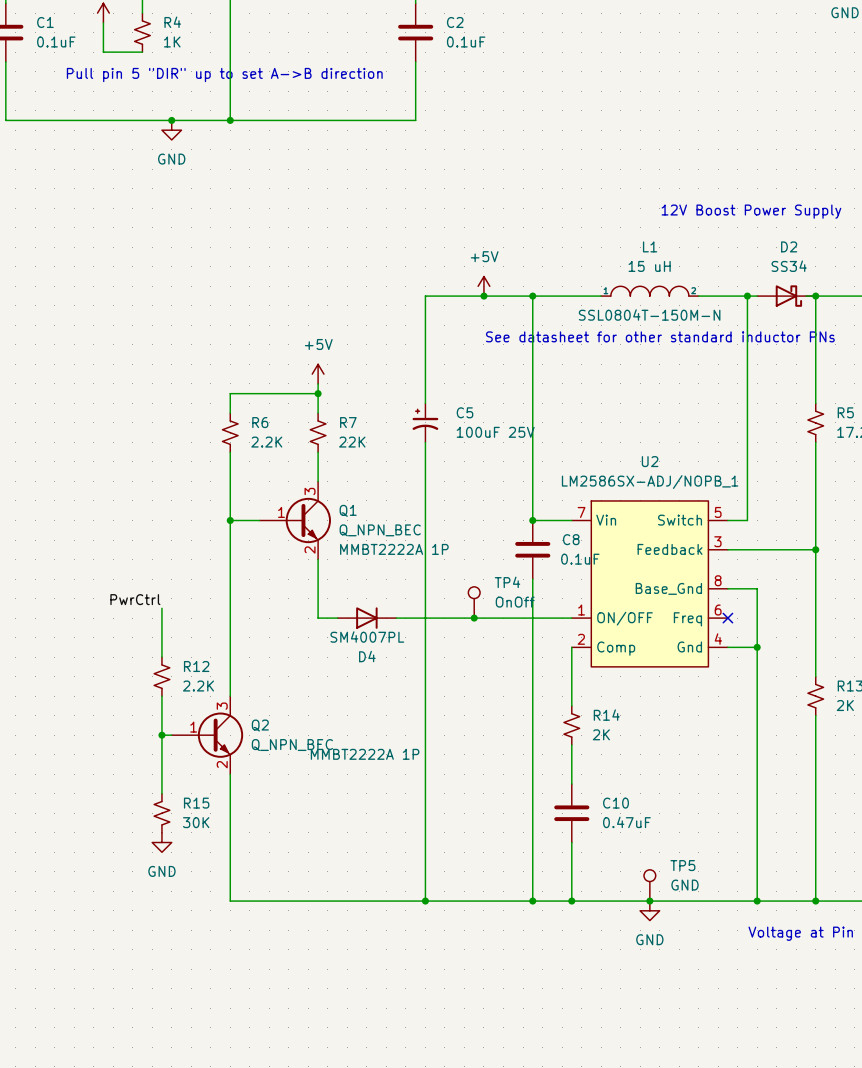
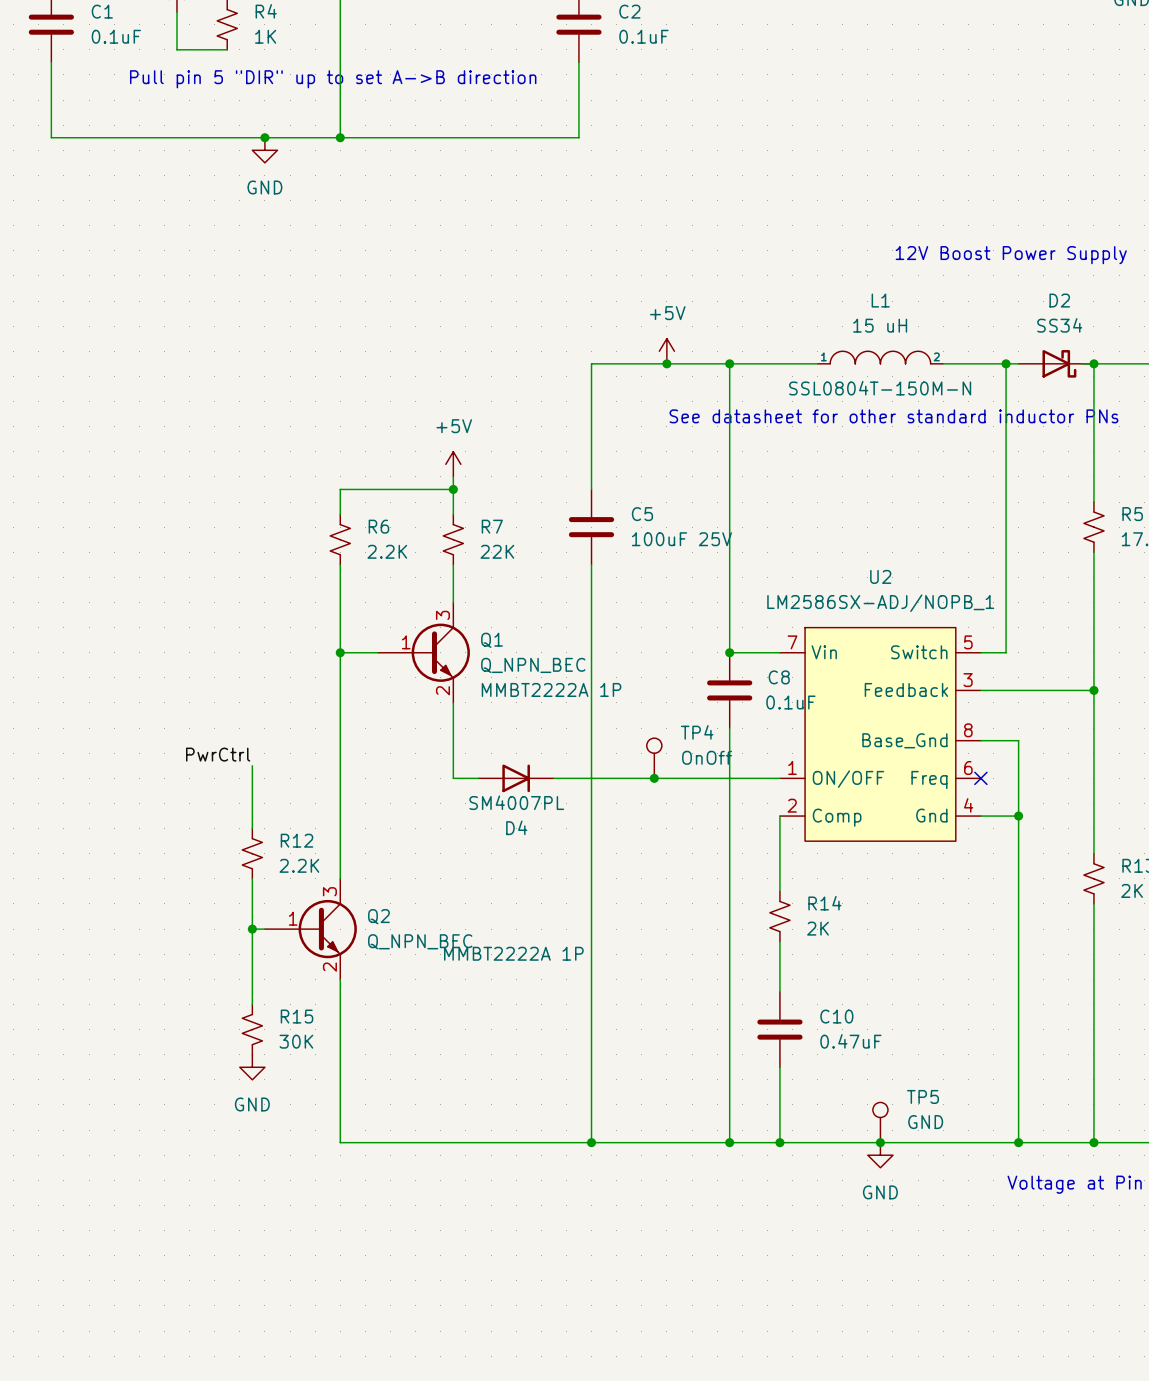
C5 symbol: [412, 403, 439, 443] -> [568, 489, 615, 565]

